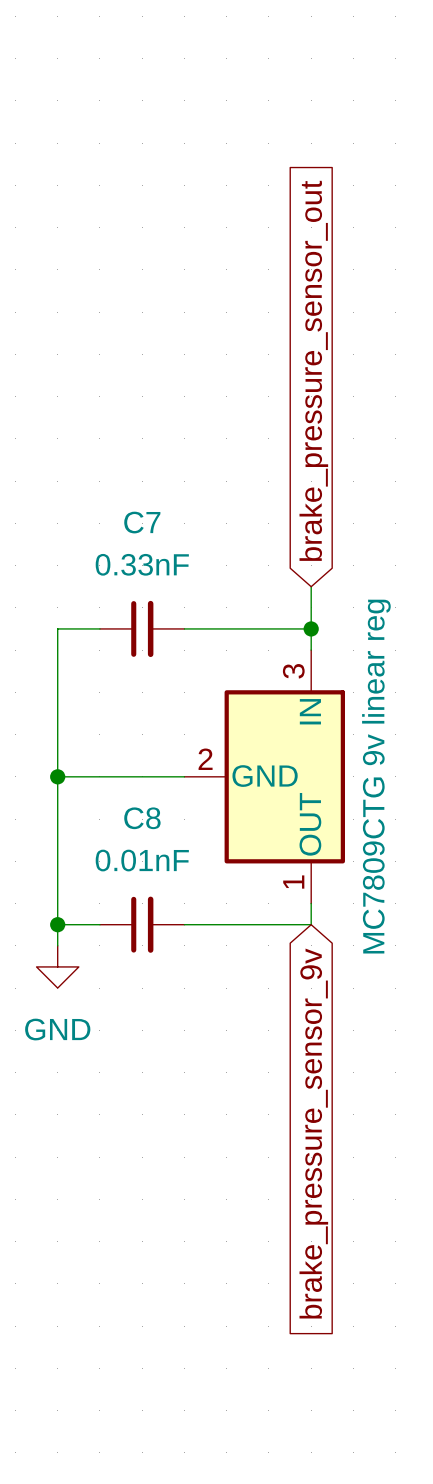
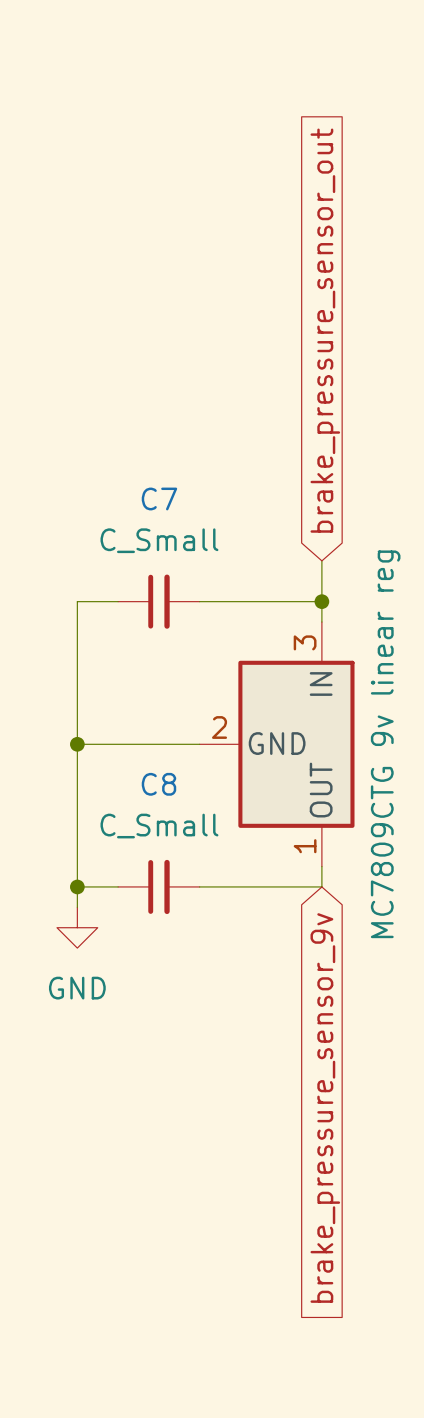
C7 value: 0.33nF (142, 564) -> C_Small (159, 540)
C8 value: 0.01nF (142, 860) -> C_Small (159, 826)

